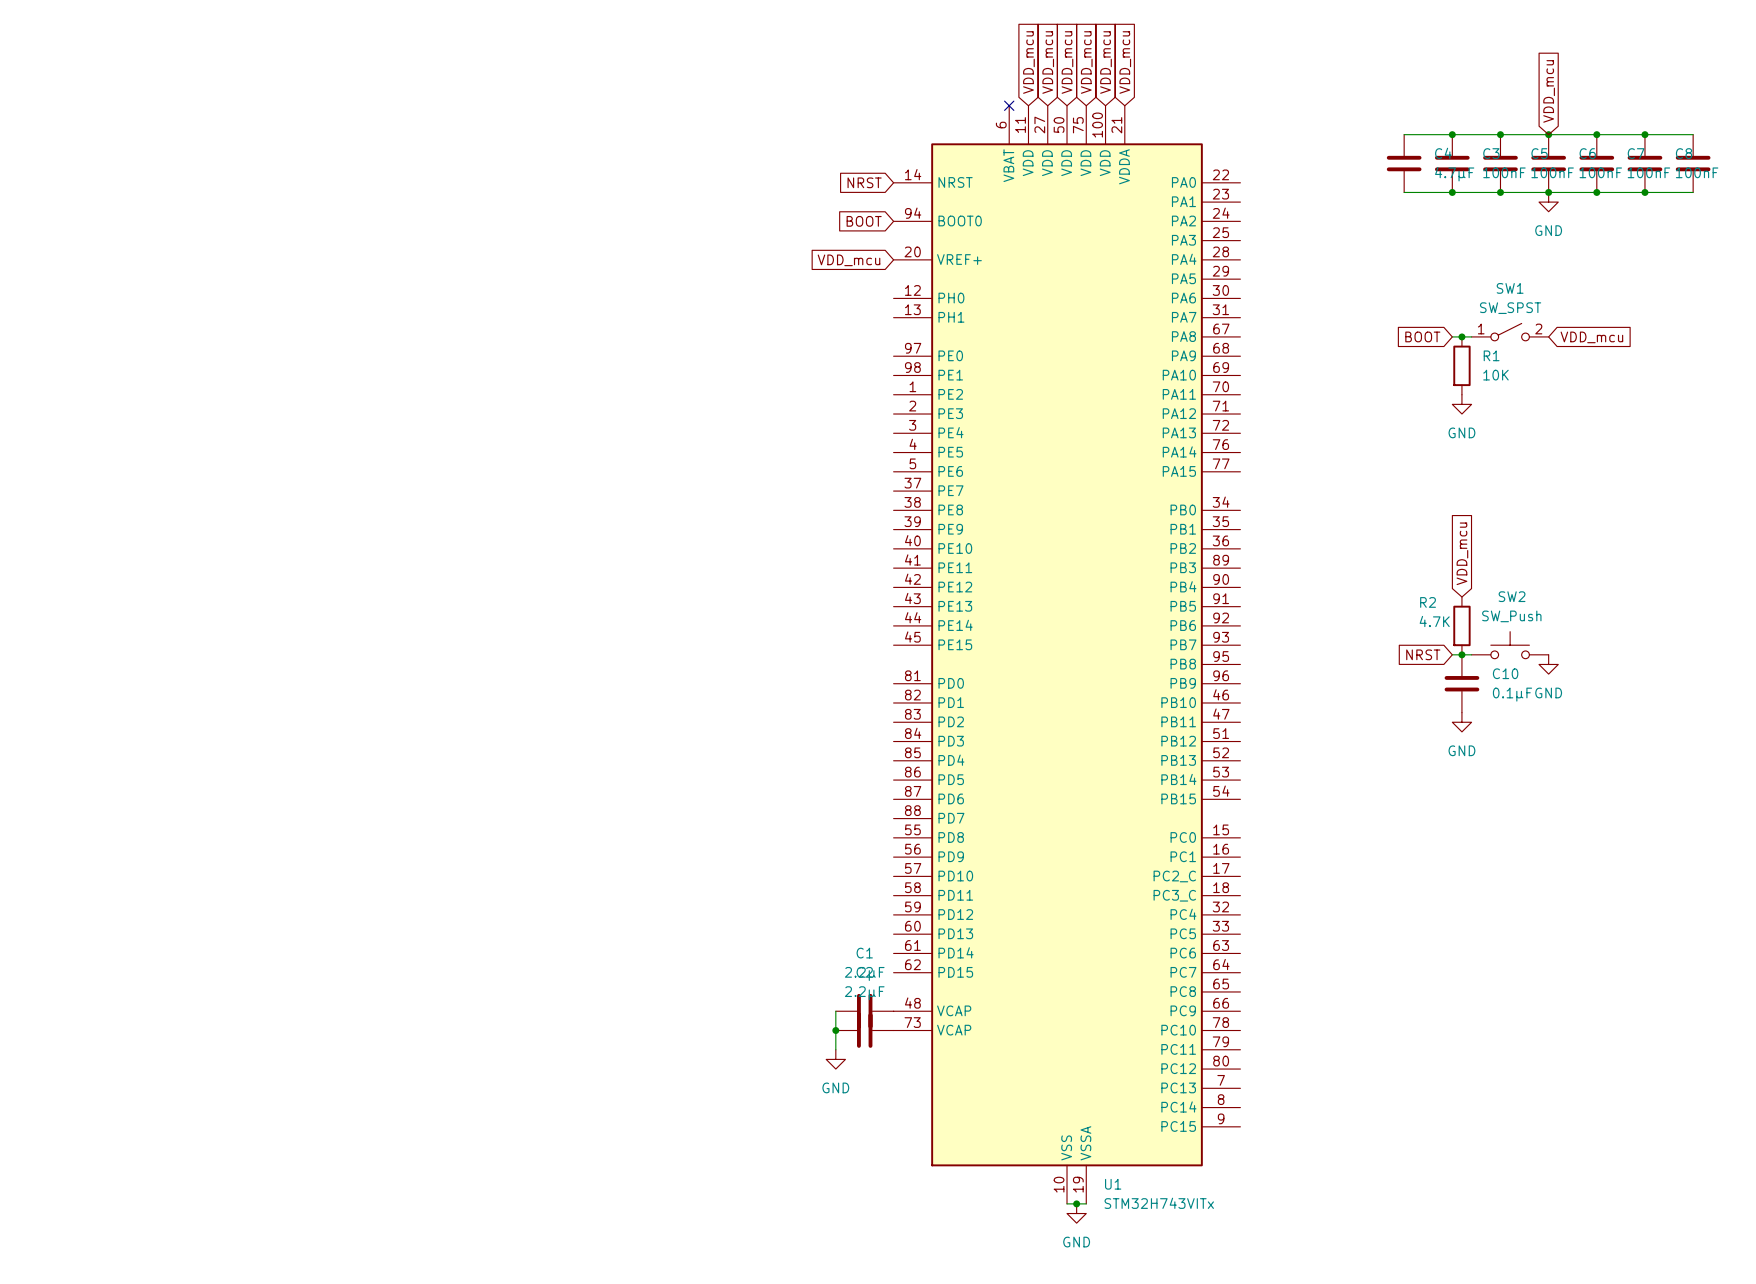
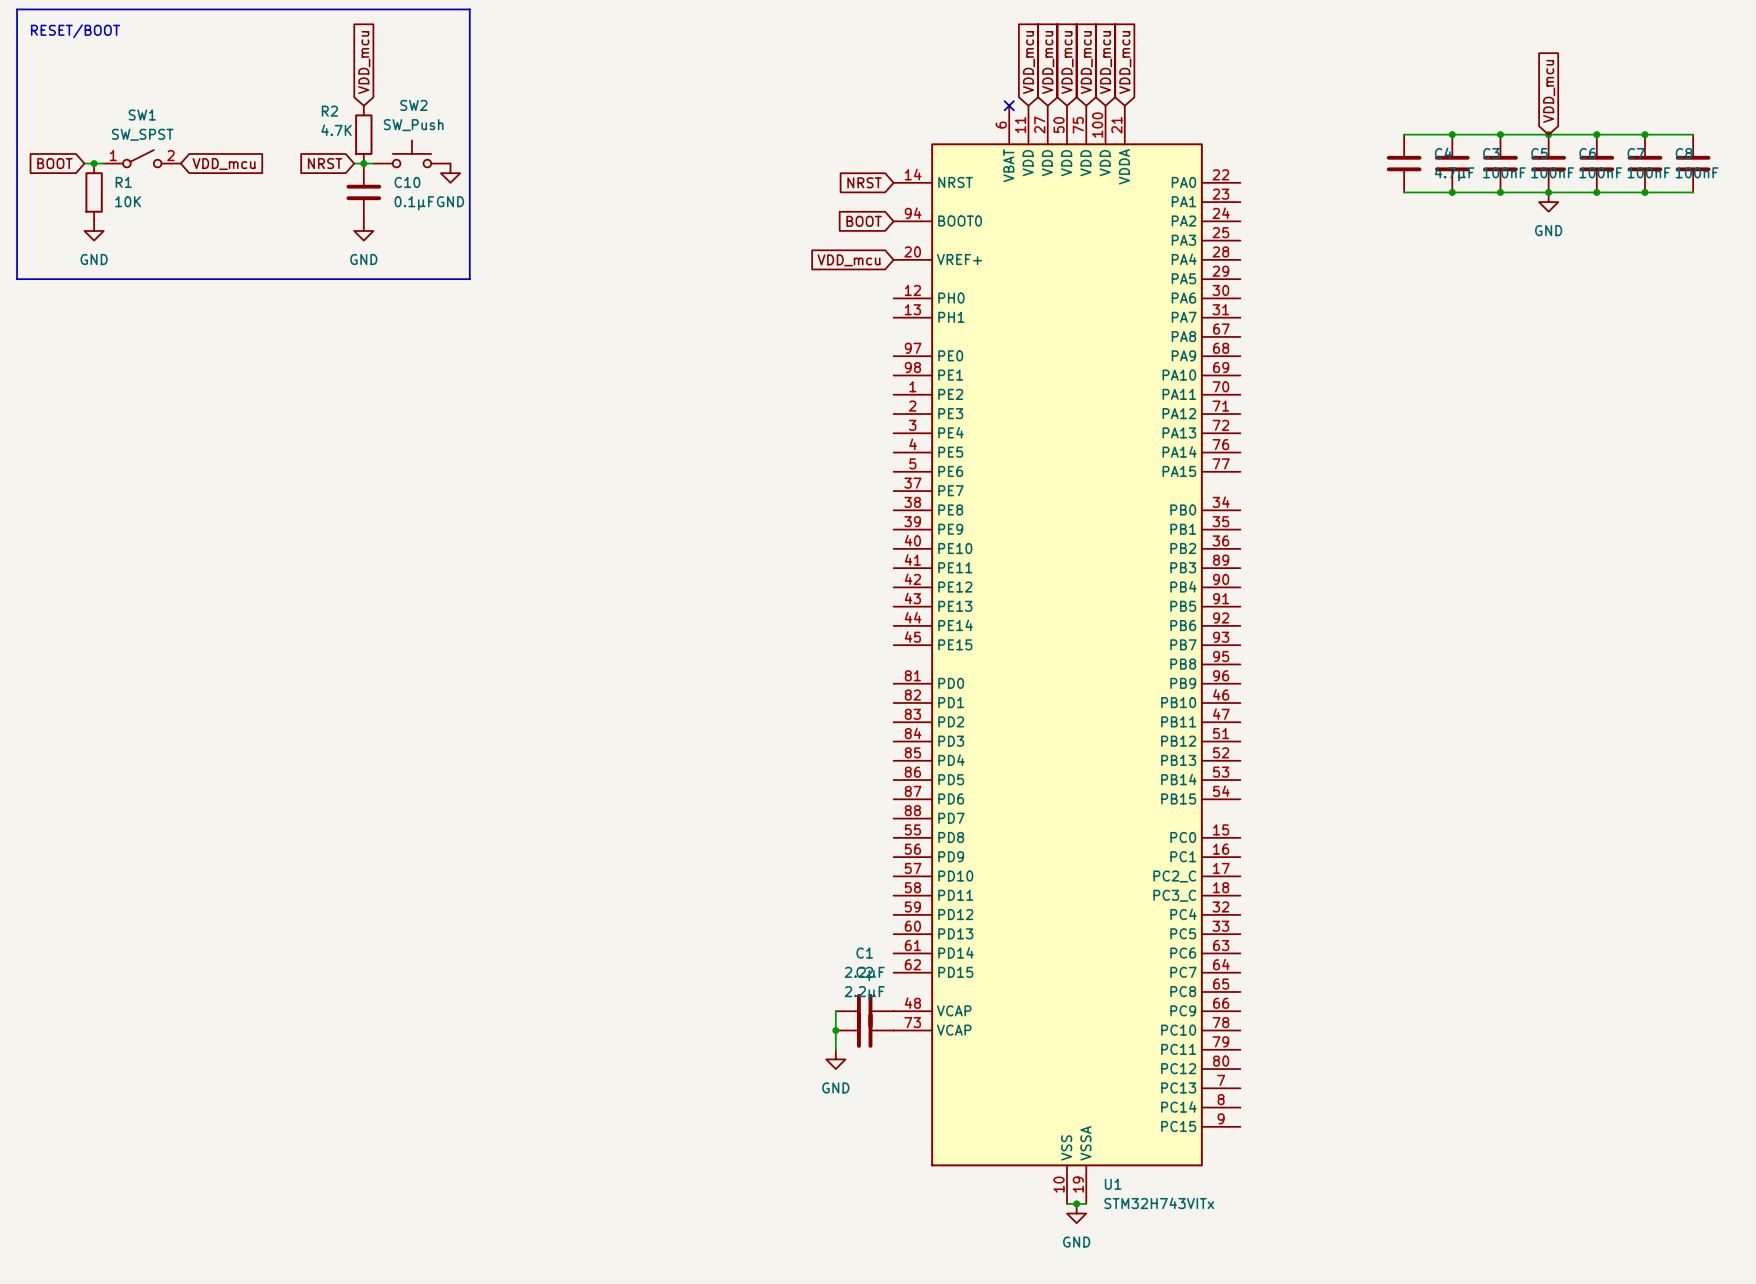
line: none -> (17, 9) (469, 9) (469, 279) (17, 279) (17, 9)
text: none -> RESET/BOOT (75, 31)
global label: none -> VDD_mcu (364, 62)
global label: none -> BOOT (54, 163)
wire: none -> (84, 163) (103, 163)
junction: none -> (94, 163)
global label: none -> NRST (325, 163)
wire: none -> (354, 163) (373, 163)
junction: none -> (363, 163)
global label: none -> VDD_mcu (224, 164)
power symbol: none -> GND (450, 173)
power symbol: none -> GND (94, 230)
power symbol: none -> GND (363, 230)
SW1 position: (1510, 332) -> (142, 158)
global label: BOOT (1422, 336) -> none
wire: (1452, 336) (1471, 336) -> none
junction: (1461, 336) -> none
global label: VDD_mcu (1591, 337) -> none
R1 position: (1461, 365) -> (94, 192)
power symbol: GND (1461, 404) -> none
global label: VDD_mcu (1462, 553) -> none
R2 position: (1461, 625) -> (363, 134)
SW2 position: (1510, 645) -> (411, 153)
global label: NRST (1423, 654) -> none
wire: (1452, 654) (1471, 654) -> none
junction: (1461, 654) -> none
power symbol: GND (1548, 664) -> none
C10 position: (1461, 683) -> (363, 192)
power symbol: GND (1461, 722) -> none

